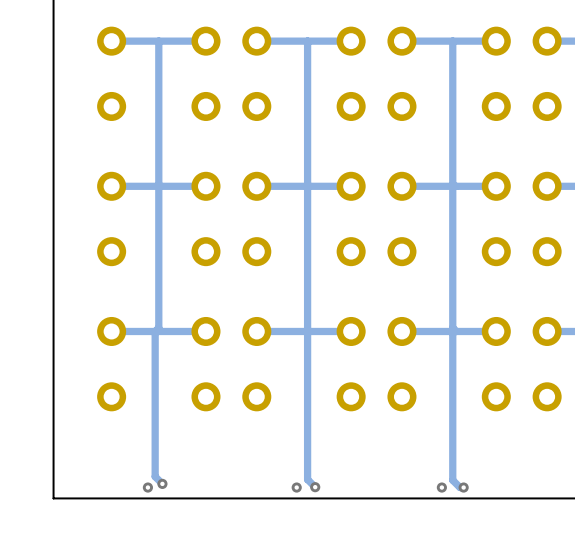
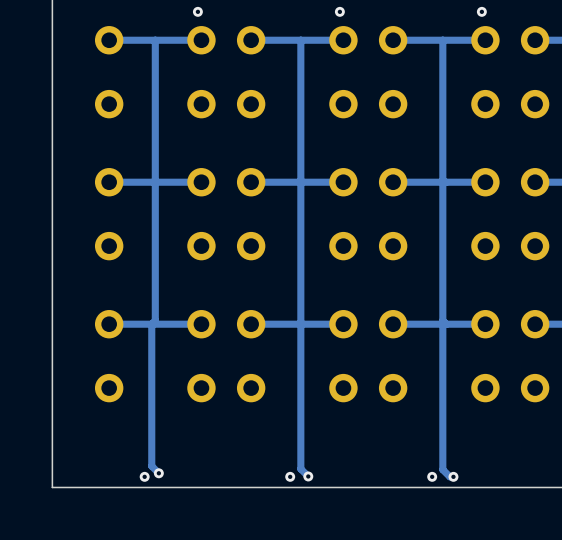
via: none -> (197, 11)
via: none -> (339, 11)
via: none -> (481, 11)

